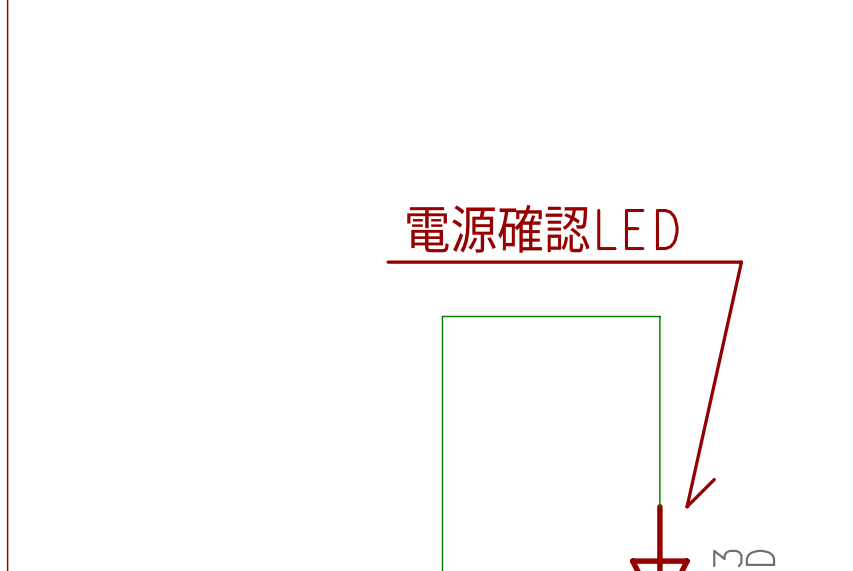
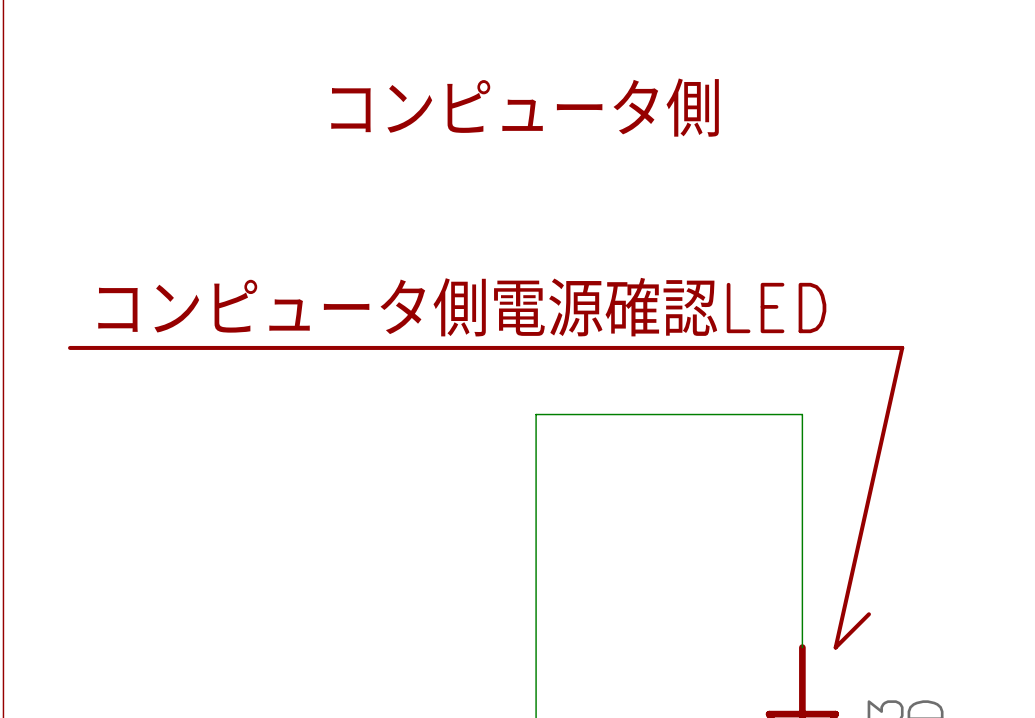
text: none -> コンピュータ側 (525, 107)
text: 電源確認LED (542, 228) -> コンピュータ側電源確認LED (461, 307)
line: none -> (70, 347) (469, 347)

